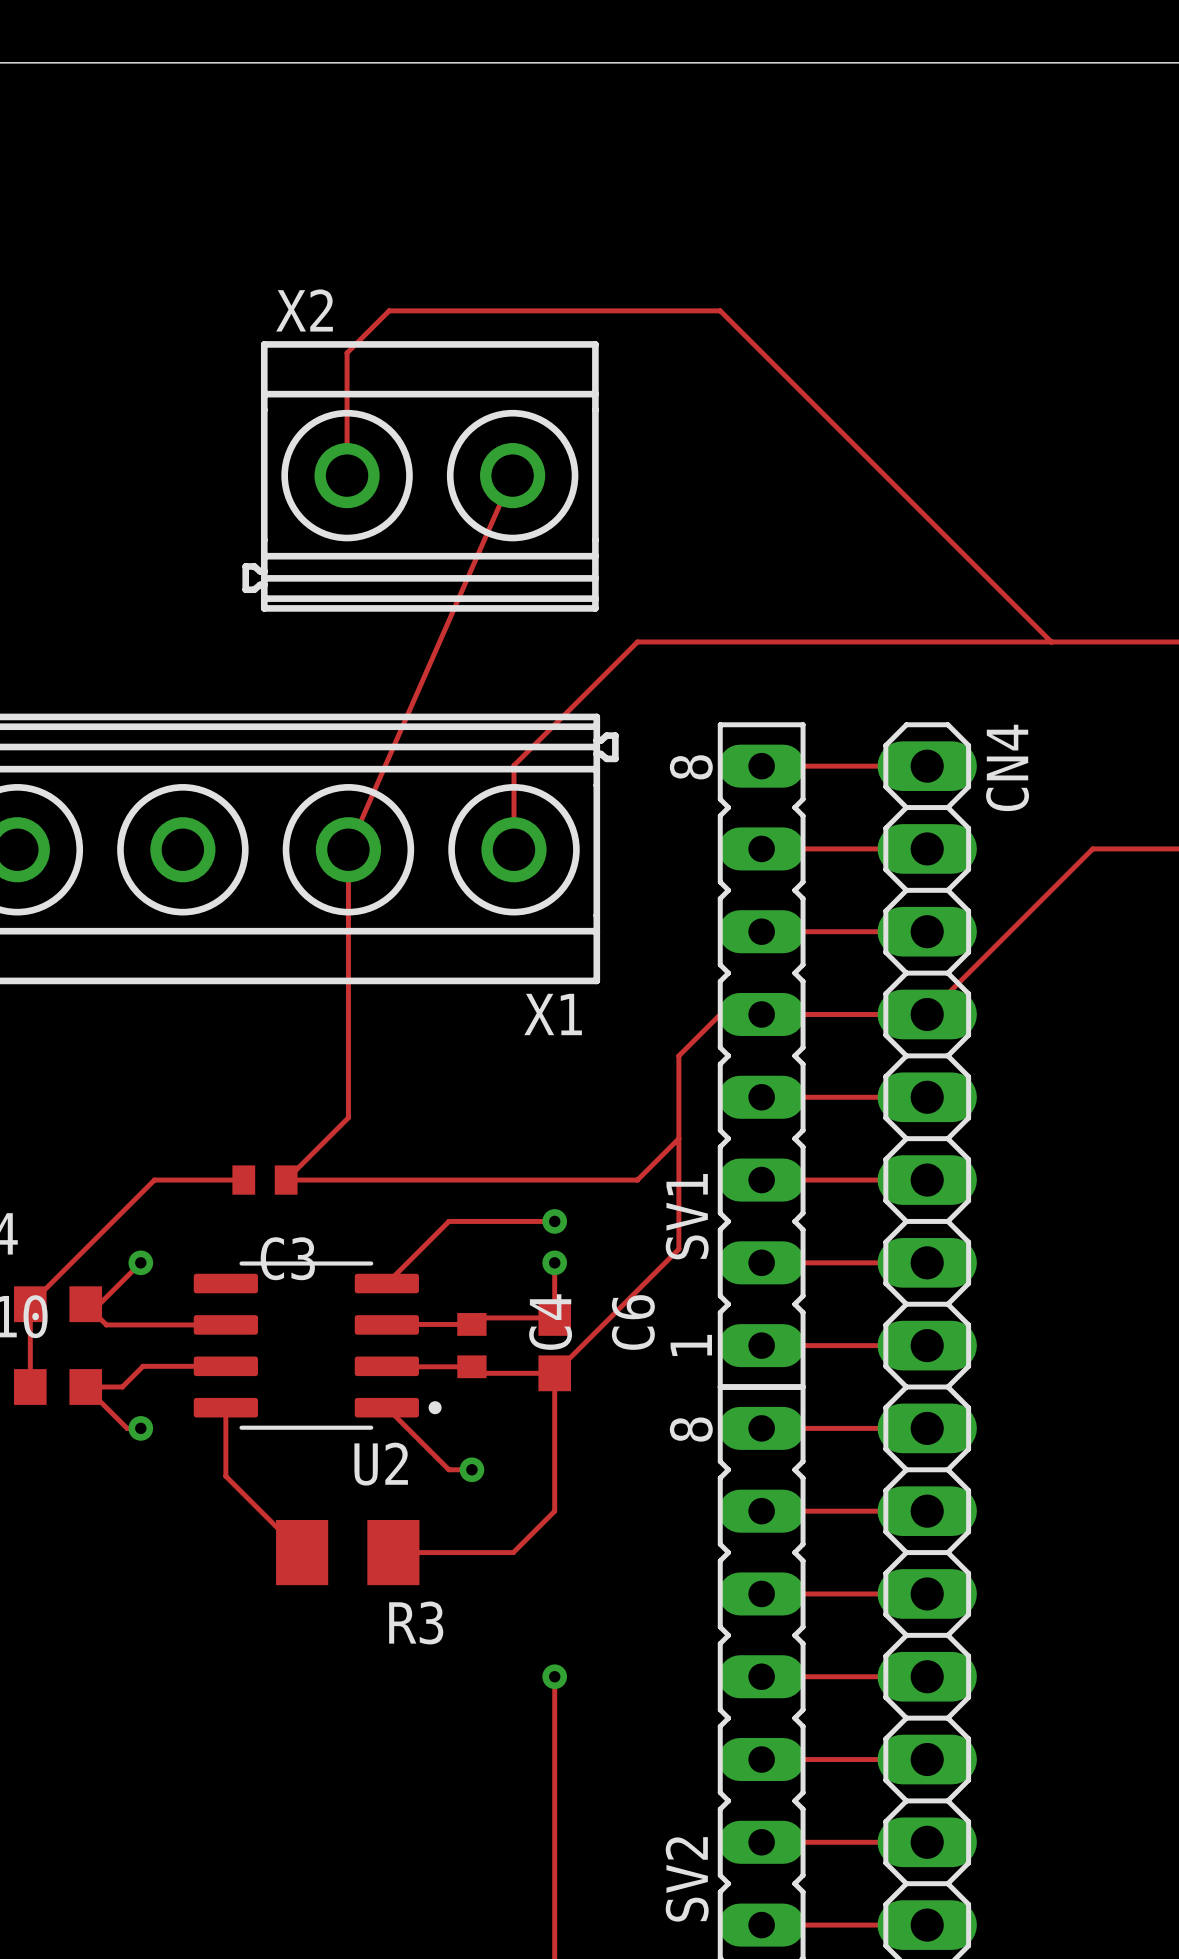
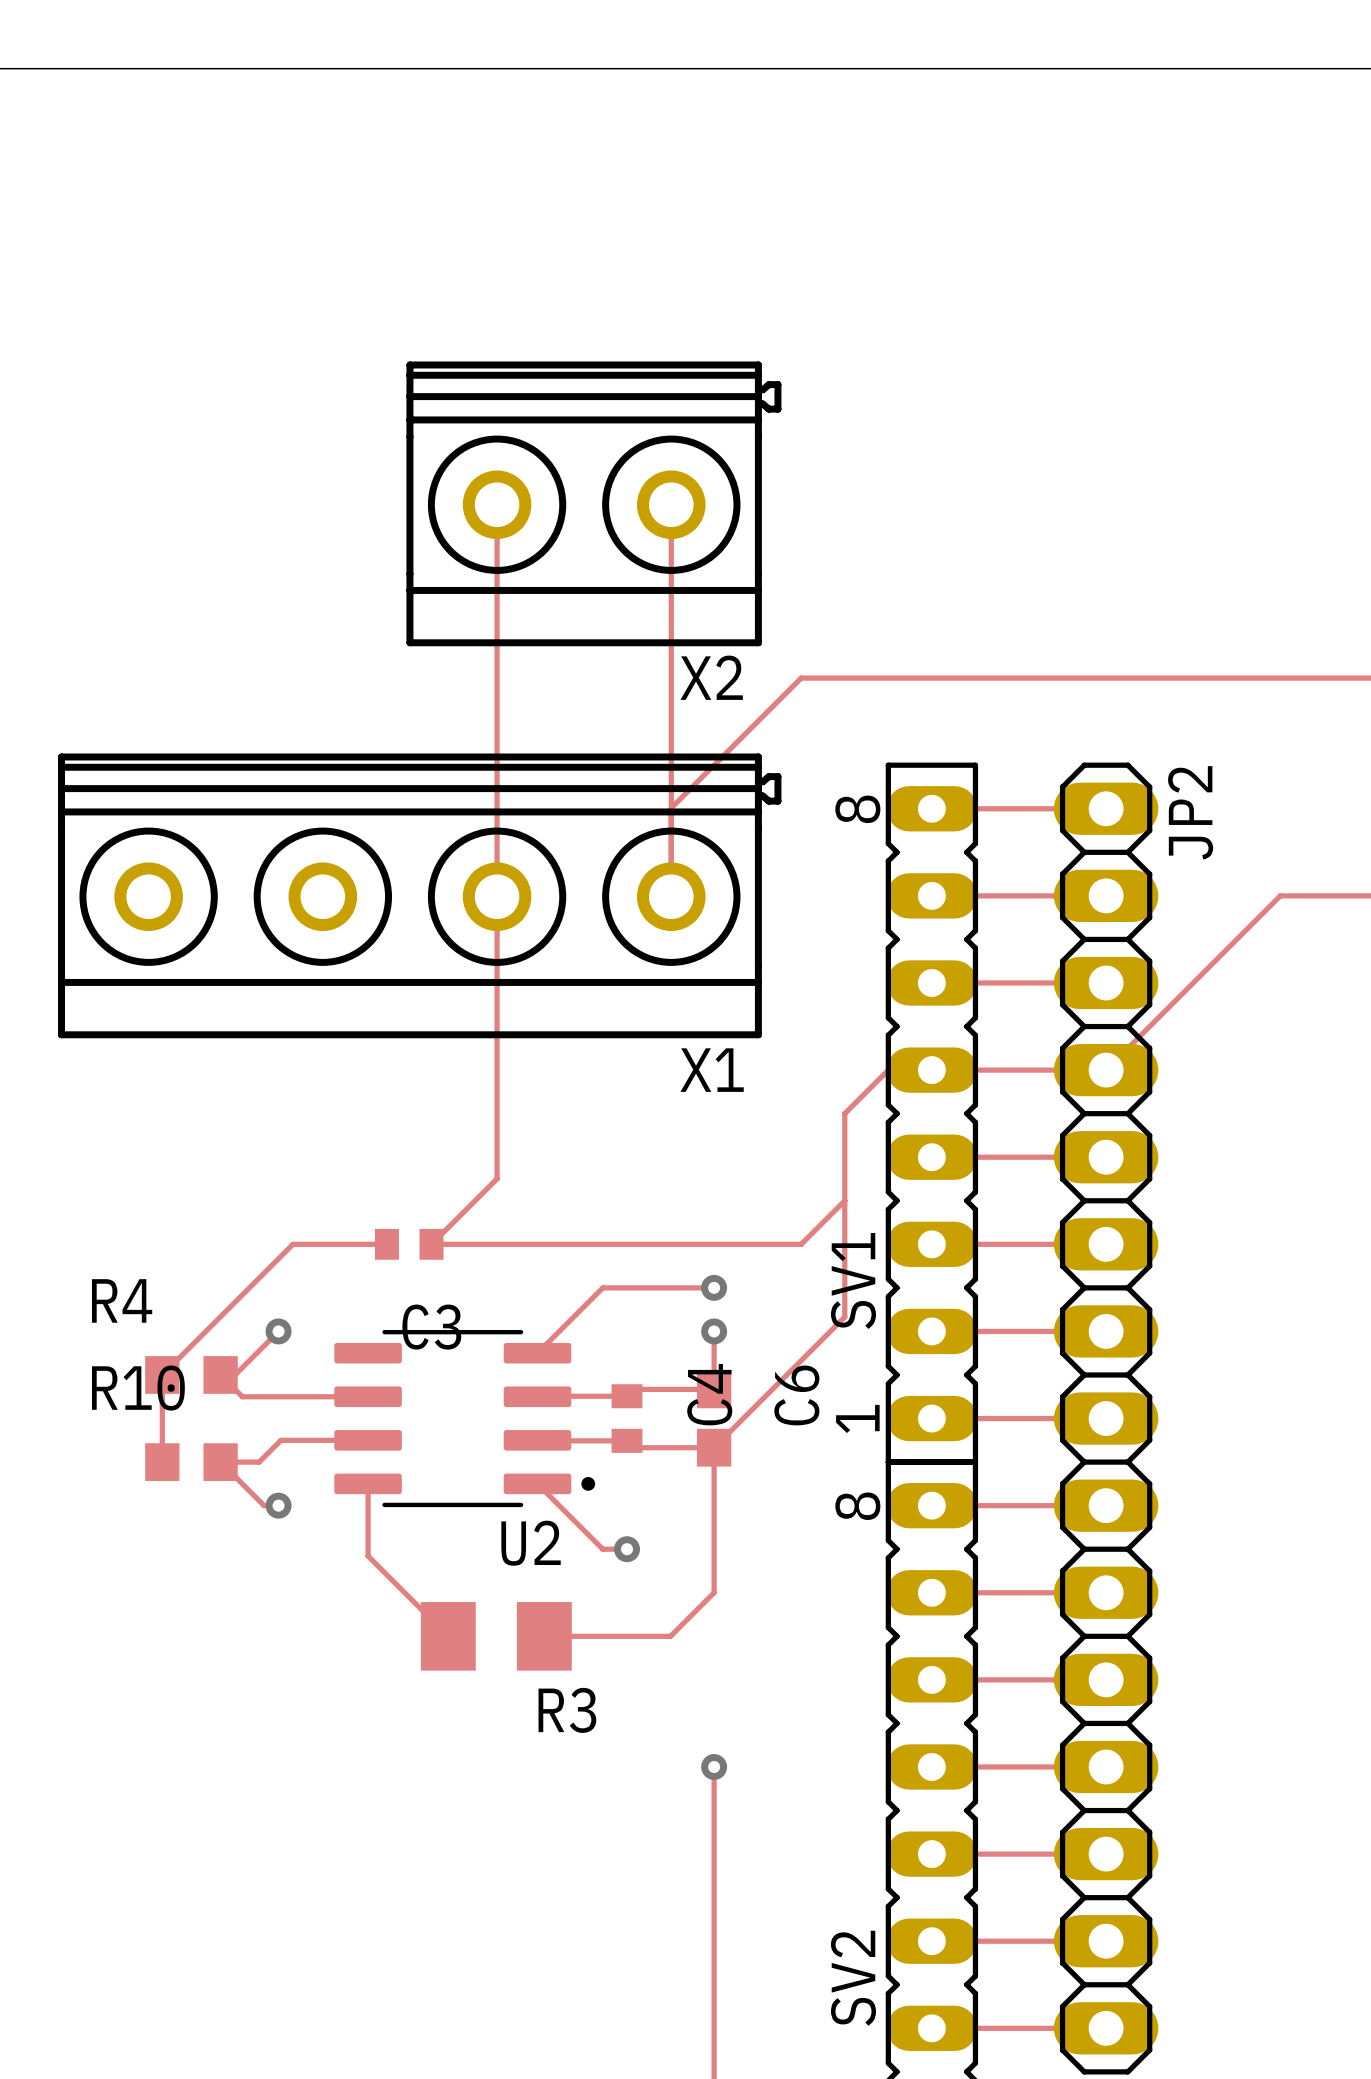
track: (347, 475) (347, 352) (389, 310) (720, 310) (1051, 641) -> none
track: (512, 475) (348, 849) -> (497, 504) (497, 896)
X2 rotation: 0° (420, 476) -> 180° (593, 503)
track: none -> (671, 504) (671, 808)
CN4 name: CN4 (1007, 767) -> JP2 (1190, 812)

